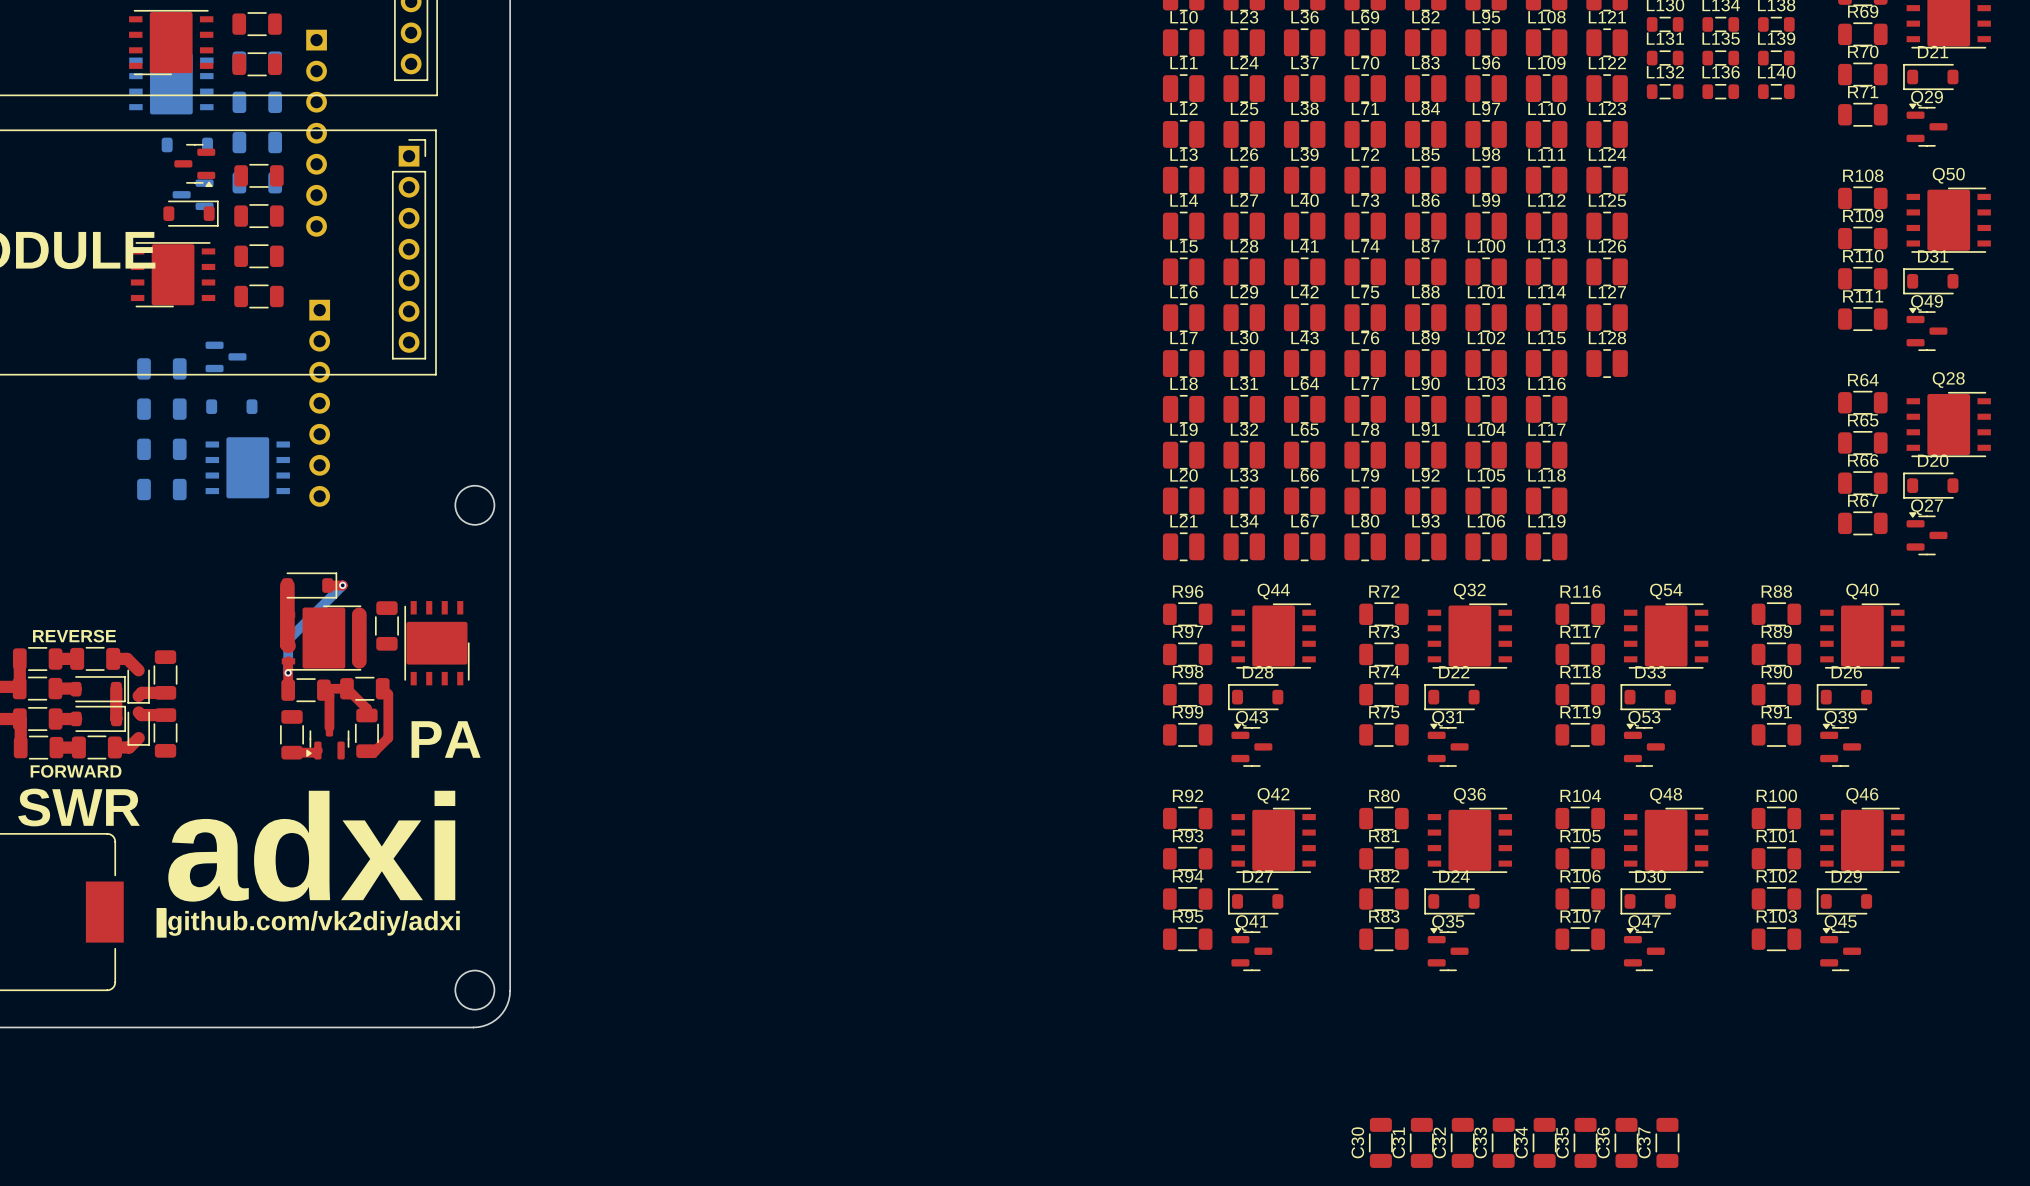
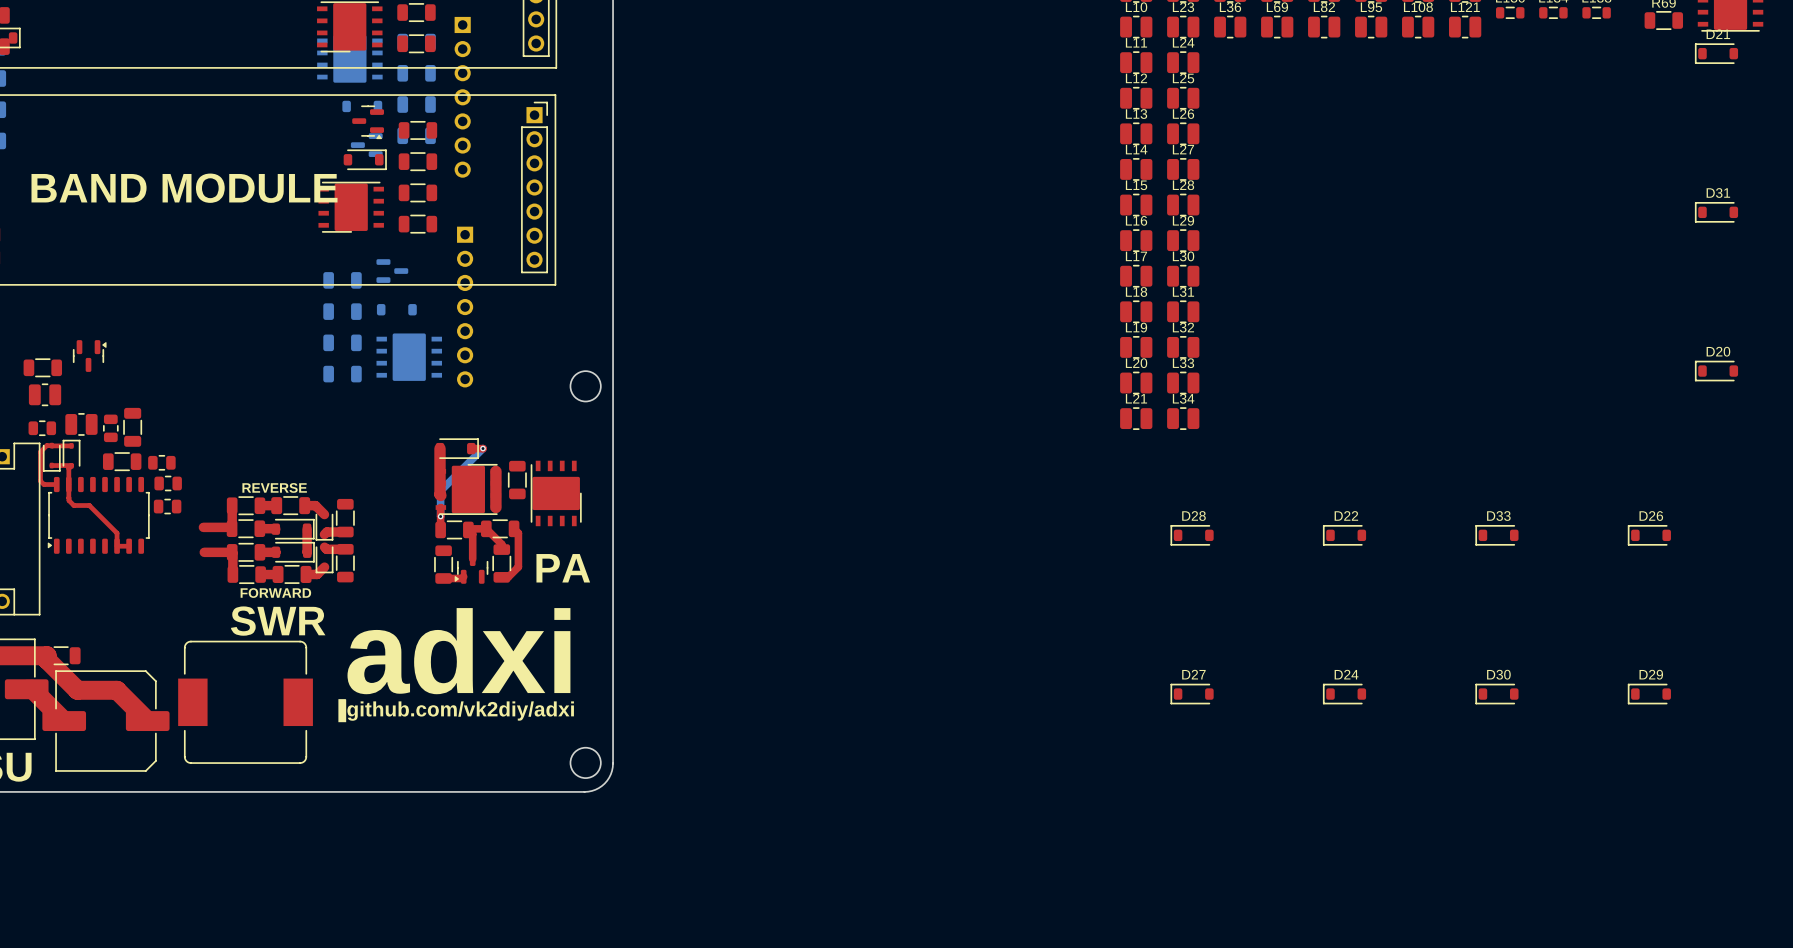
L131: (1665, 58) -> none
L135: (1720, 58) -> none
L139: (1776, 58) -> none
R70: (1862, 74) -> none
L37: (1304, 88) -> none
L70: (1365, 88) -> none
L83: (1425, 88) -> none
L96: (1486, 88) -> none
L109: (1546, 88) -> none
L122: (1607, 88) -> none
L132: (1665, 91) -> none
L136: (1720, 91) -> none
L140: (1776, 91) -> none
R71: (1862, 114) -> none
Q29: (1927, 125) -> none
L38: (1304, 134) -> none
L71: (1365, 134) -> none
L84: (1425, 134) -> none
L97: (1486, 134) -> none
L110: (1546, 134) -> none
L123: (1607, 134) -> none
L39: (1304, 180) -> none
L72: (1365, 180) -> none
L85: (1425, 180) -> none
L98: (1486, 180) -> none
L111: (1546, 180) -> none
L124: (1607, 180) -> none
R108: (1862, 198) -> none
Q50: (1948, 220) -> none
L40: (1304, 226) -> none
L73: (1365, 226) -> none
L86: (1425, 226) -> none
L99: (1486, 226) -> none
L112: (1546, 226) -> none
L125: (1607, 226) -> none
R109: (1862, 238) -> none
L41: (1304, 271) -> none
L74: (1365, 271) -> none
L87: (1425, 271) -> none
L100: (1486, 271) -> none
L113: (1546, 271) -> none
L126: (1607, 271) -> none
R110: (1862, 278) -> none
L42: (1304, 317) -> none
L75: (1365, 317) -> none
L88: (1425, 317) -> none
L101: (1486, 317) -> none
L114: (1546, 317) -> none
L127: (1607, 317) -> none
R111: (1862, 319) -> none
Q49: (1927, 329) -> none
L43: (1304, 363) -> none
L76: (1365, 363) -> none
L89: (1425, 363) -> none
L102: (1486, 363) -> none
L115: (1546, 363) -> none
L128: (1607, 363) -> none
R64: (1862, 402) -> none
L64: (1304, 409) -> none
L77: (1365, 409) -> none
L90: (1425, 409) -> none
L103: (1486, 409) -> none
L116: (1546, 409) -> none
Q28: (1948, 424) -> none
R65: (1862, 442) -> none
L65: (1304, 455) -> none
L78: (1365, 455) -> none
L91: (1425, 455) -> none
L104: (1486, 455) -> none
L117: (1546, 455) -> none
R66: (1862, 483) -> none
L66: (1304, 501) -> none
L79: (1365, 501) -> none
L92: (1425, 501) -> none
L105: (1486, 501) -> none
L118: (1546, 501) -> none
R67: (1862, 523) -> none
Q27: (1927, 533) -> none
L67: (1304, 546) -> none
L80: (1365, 546) -> none
L93: (1425, 546) -> none
L106: (1486, 546) -> none
L119: (1546, 546) -> none
R96: (1187, 614) -> none
R72: (1383, 614) -> none
R116: (1580, 614) -> none
R88: (1776, 614) -> none
Q44: (1273, 636) -> none
Q32: (1469, 636) -> none
Q54: (1666, 636) -> none
Q40: (1862, 636) -> none
R97: (1187, 654) -> none
R73: (1383, 654) -> none
R117: (1580, 654) -> none
R89: (1776, 654) -> none
R98: (1187, 694) -> none
R74: (1383, 694) -> none
R118: (1580, 694) -> none
R90: (1776, 694) -> none
R99: (1187, 734) -> none
R75: (1383, 734) -> none
R119: (1580, 734) -> none
R91: (1776, 734) -> none
Q43: (1251, 745) -> none
Q31: (1448, 745) -> none
Q53: (1644, 745) -> none
Q39: (1840, 745) -> none
R92: (1187, 818) -> none
R80: (1383, 818) -> none
R104: (1580, 818) -> none
R100: (1776, 818) -> none
Q42: (1273, 840) -> none
Q36: (1469, 840) -> none
Q48: (1666, 840) -> none
Q46: (1862, 840) -> none
R93: (1187, 858) -> none
R81: (1383, 858) -> none
R105: (1580, 858) -> none
R101: (1776, 858) -> none
R94: (1187, 899) -> none
R82: (1383, 899) -> none
R106: (1580, 899) -> none
R102: (1776, 899) -> none
R95: (1187, 939) -> none
R83: (1383, 939) -> none
R107: (1580, 939) -> none
R103: (1776, 939) -> none
Q41: (1251, 949) -> none
Q35: (1448, 949) -> none
Q47: (1644, 949) -> none
Q45: (1840, 949) -> none
C30: (1380, 1142) -> none
C31: (1421, 1142) -> none
C32: (1462, 1142) -> none
C33: (1503, 1142) -> none
C34: (1544, 1142) -> none
C35: (1585, 1142) -> none
C36: (1626, 1142) -> none
C37: (1667, 1142) -> none

